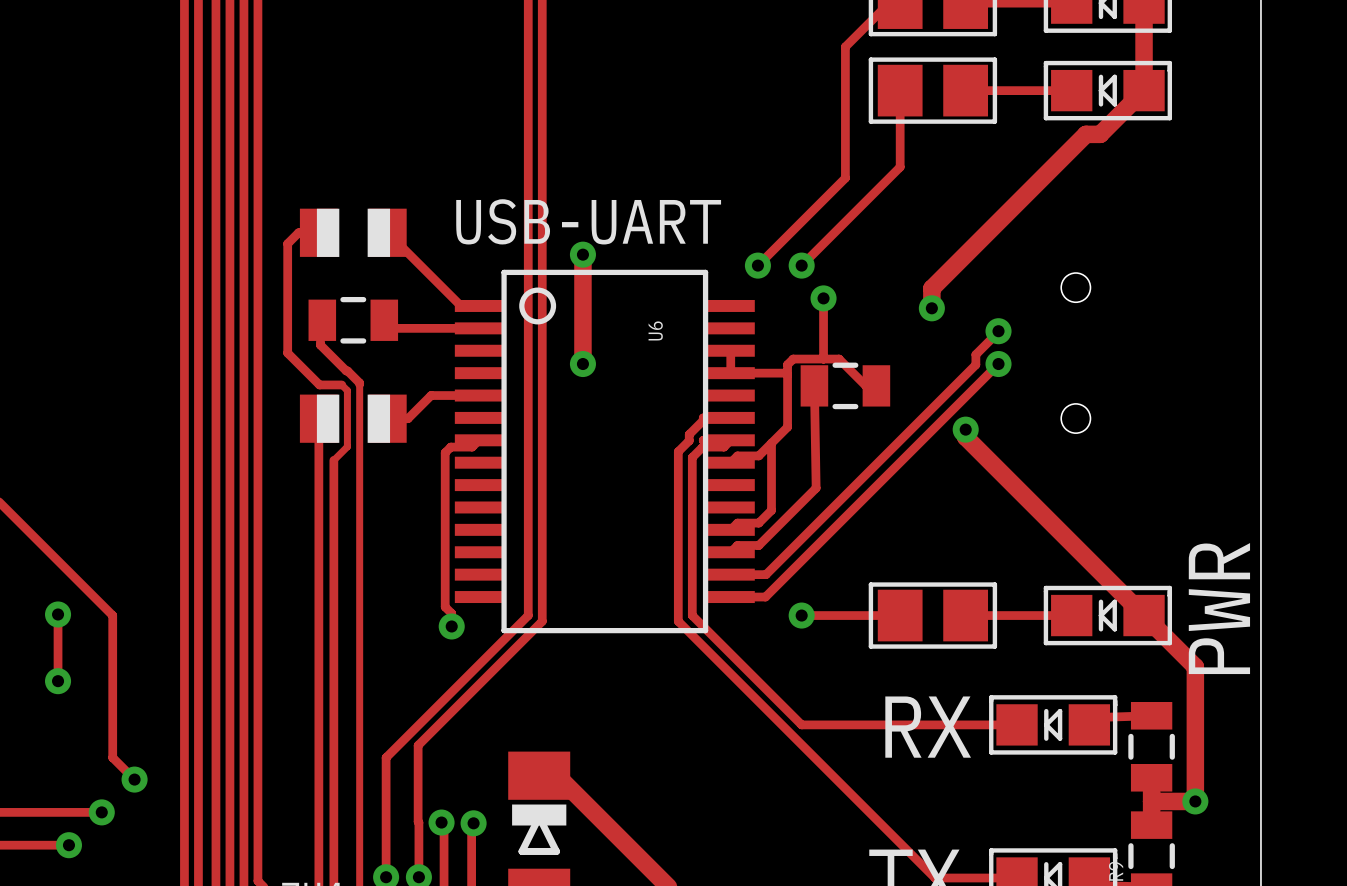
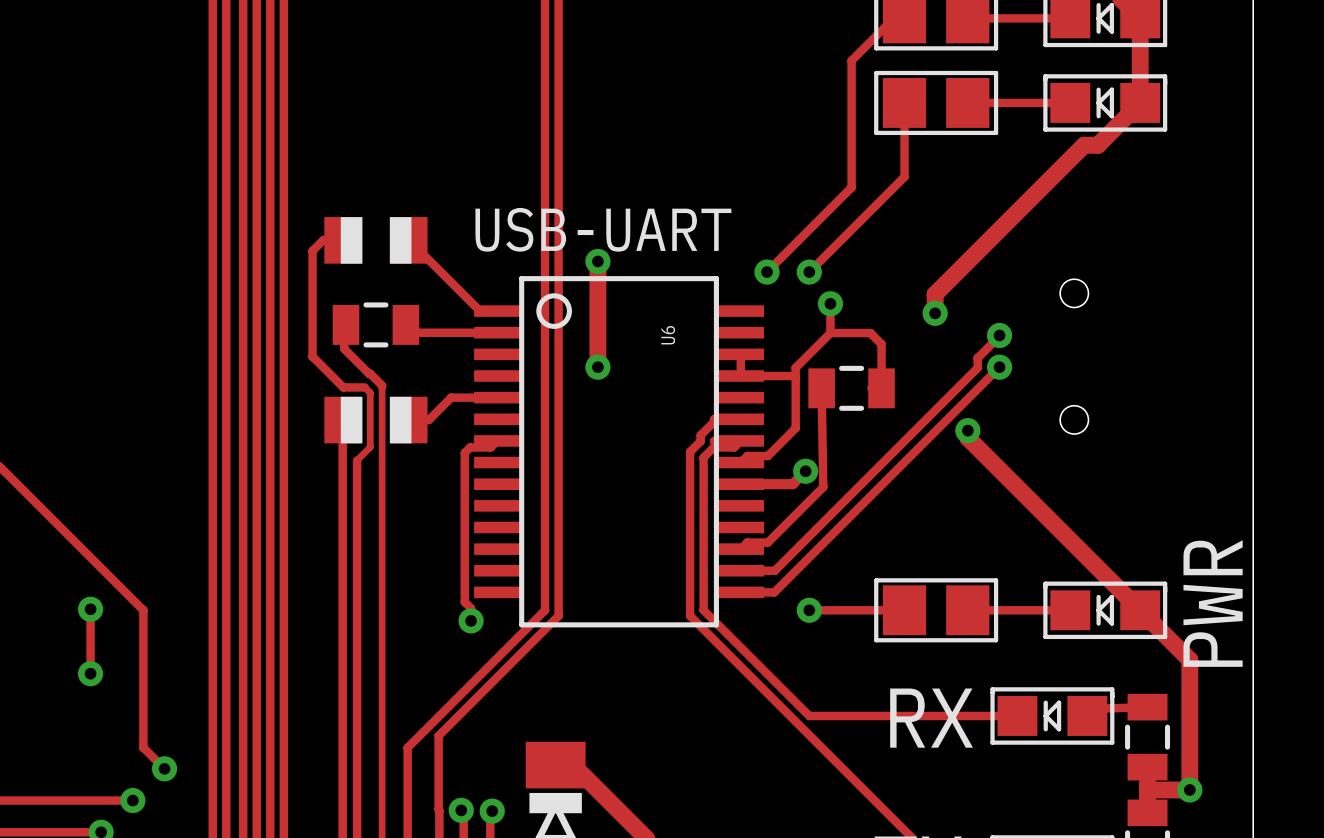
track: (823, 328) (823, 359) -> none
track: (793, 359) (839, 359) (865, 385) -> (801, 362) (830, 333) (870, 333) (881, 344) (881, 388)
track: (771, 443) (771, 510) (758, 523) (737, 523) (730, 529) -> none
track: none -> (805, 471) (792, 484) (740, 484)
via: none -> (805, 471)

